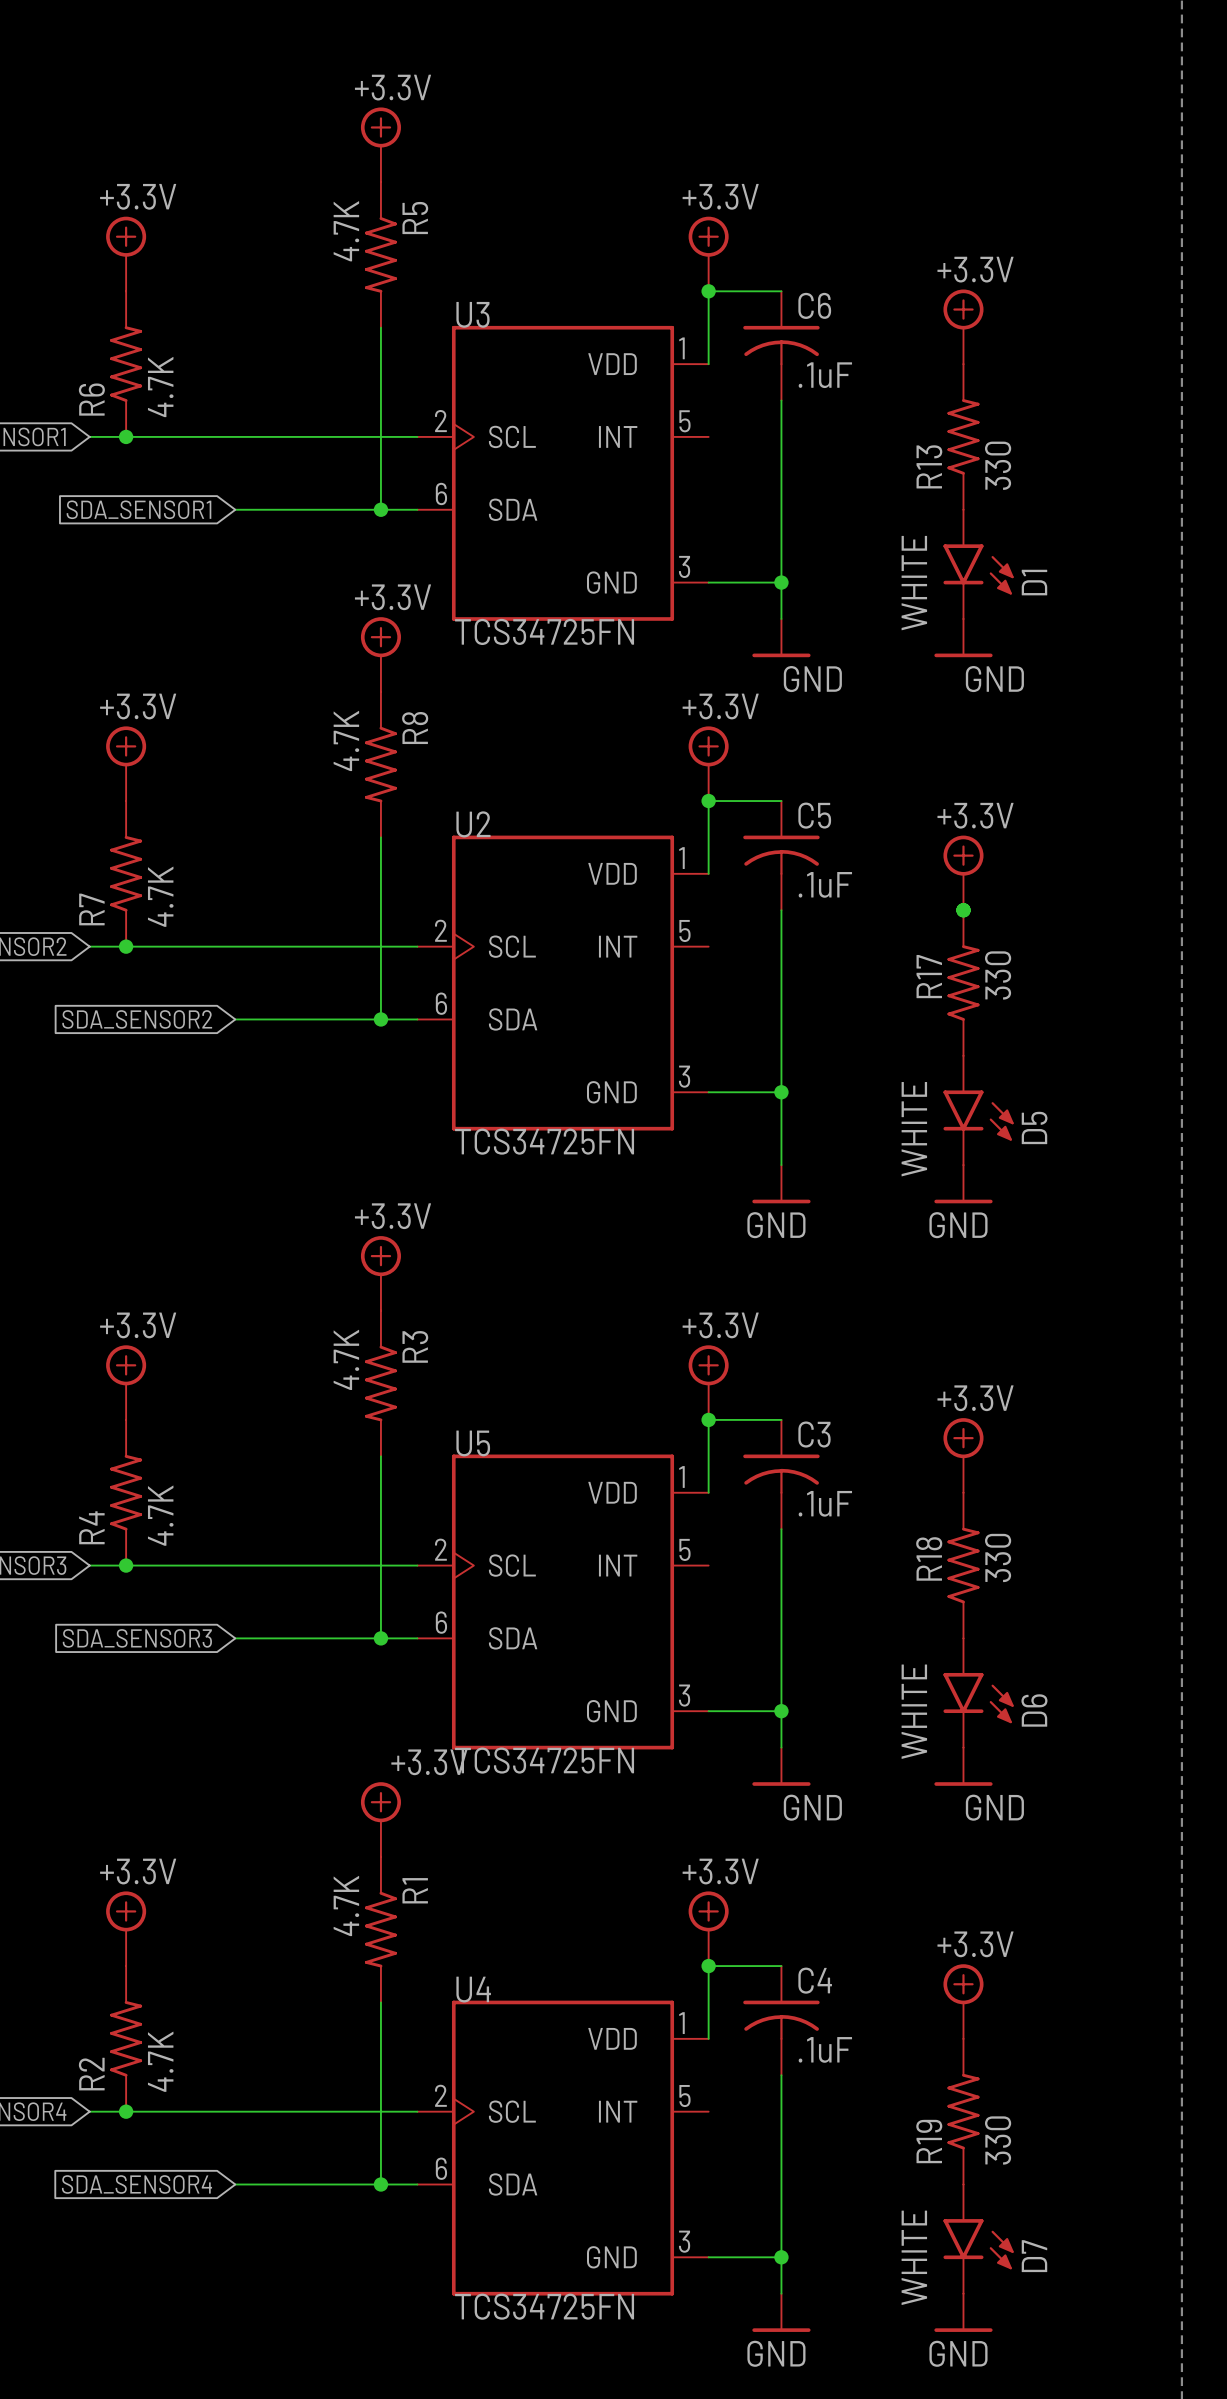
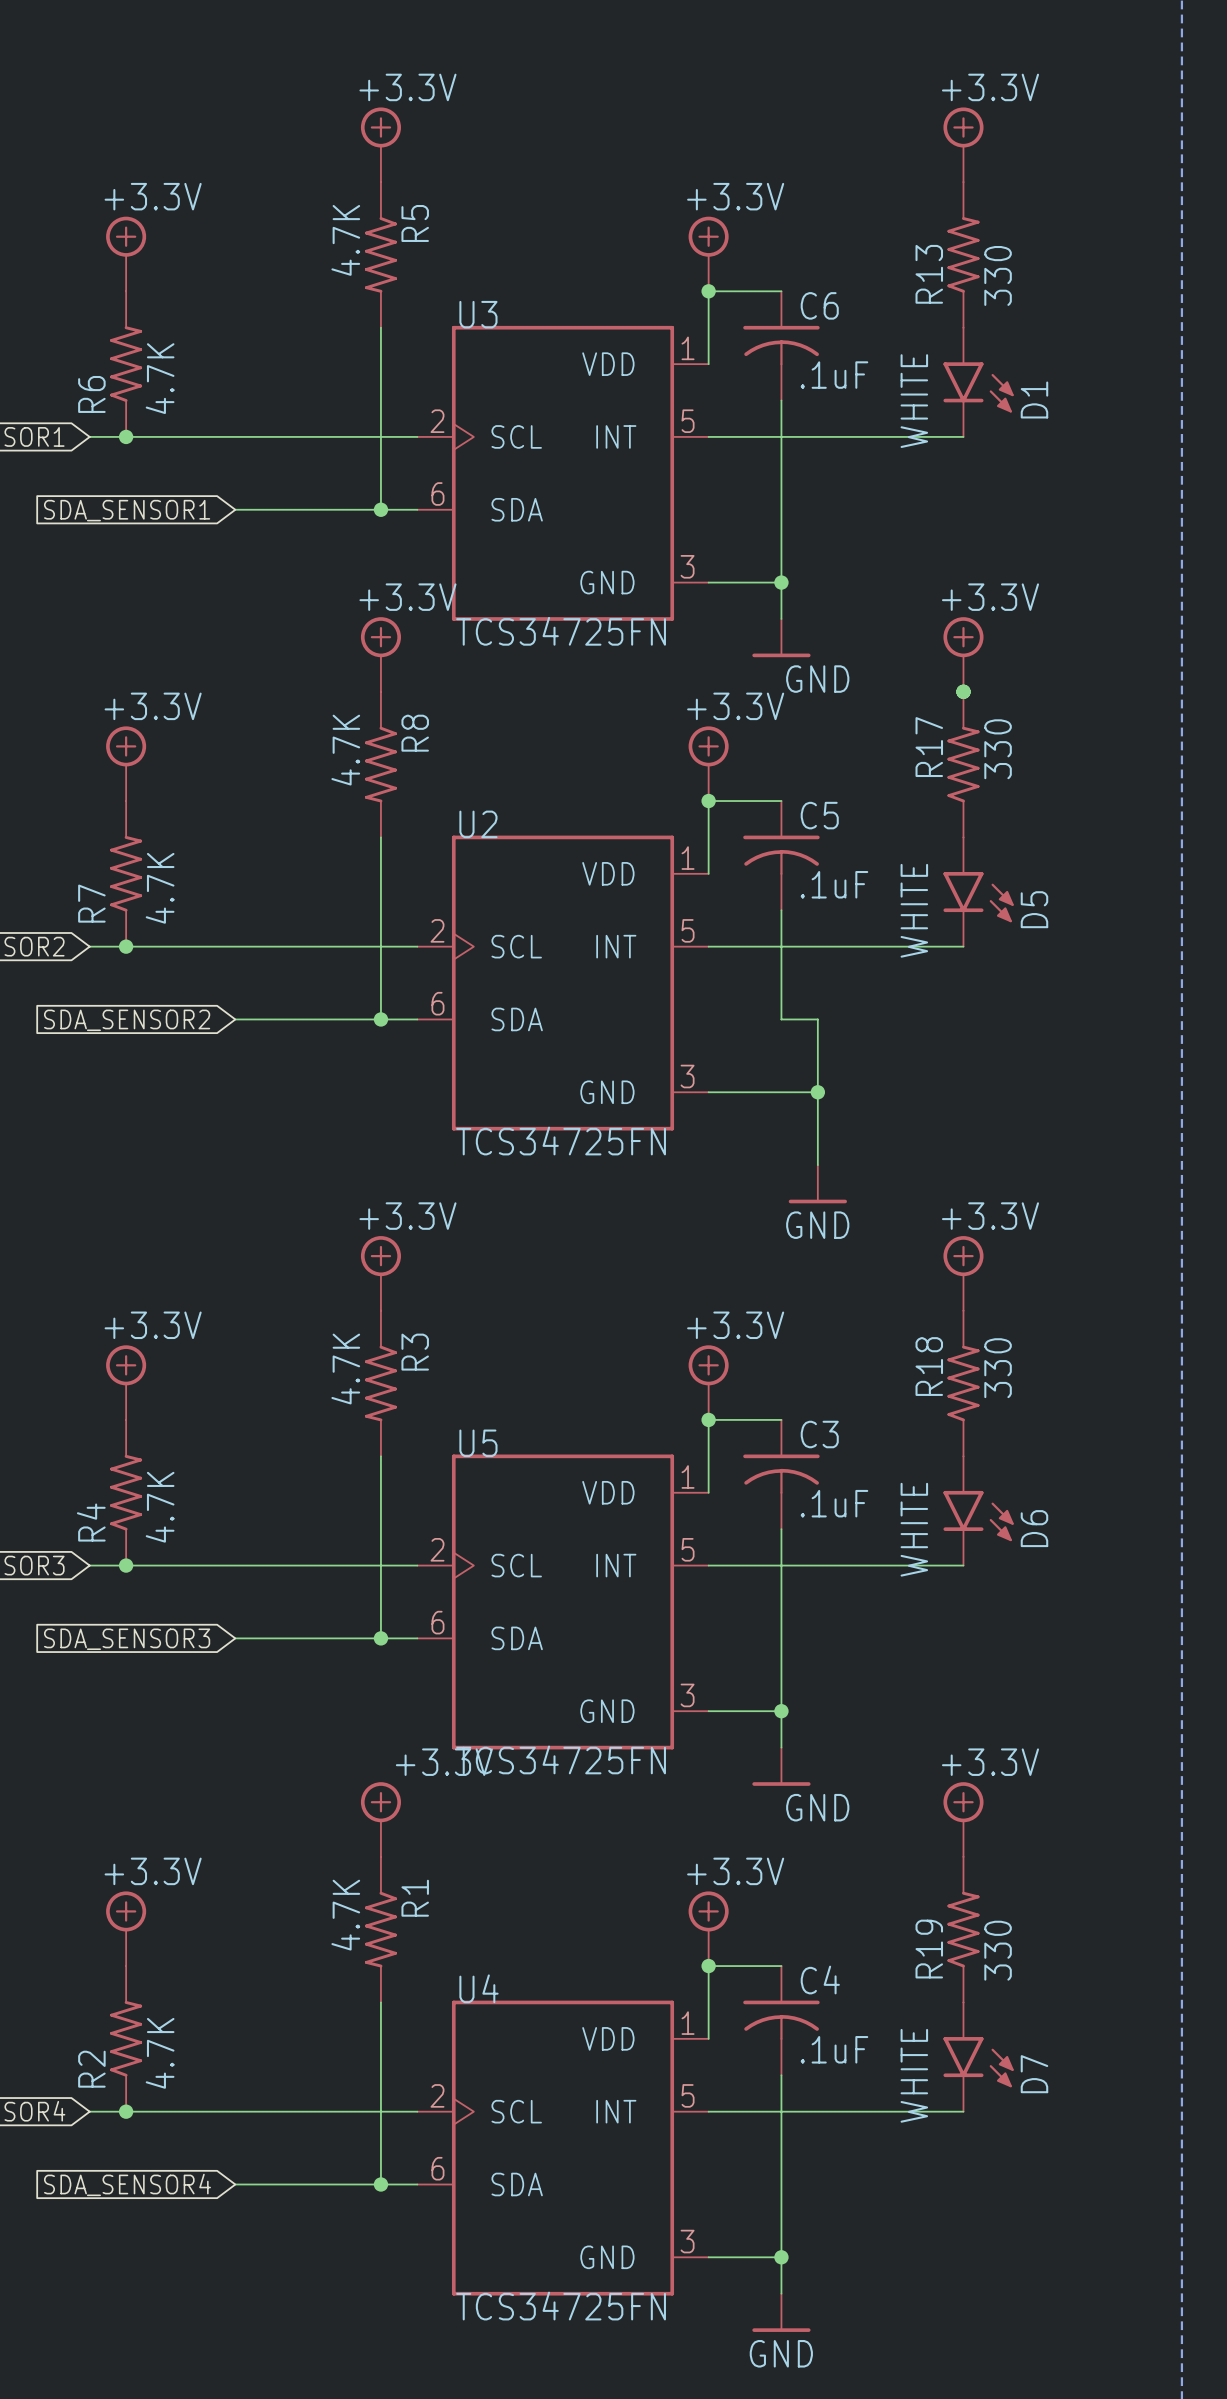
power symbol: none -> +3.3V (963, 144)
power symbol: +3.3V (963, 326) -> none
wire: none -> (708, 436) (963, 436)
R13 position: (963, 436) -> (963, 254)
D1 position: (978, 564) -> (978, 382)
power symbol: GND (963, 638) -> none
power symbol: none -> +3.3V (963, 654)
junction: none -> (963, 691)
power symbol: +3.3V (963, 872) -> none
junction: (963, 910) -> none
wire: none -> (708, 946) (963, 946)
R17 position: (963, 983) -> (963, 764)
wire: (781, 1019) (781, 1165) -> (781, 1019) (817, 1019) (817, 1165)
wire: none -> (781, 1092) (817, 1092)
junction position: (781, 1092) -> (817, 1092)
D5 position: (978, 1110) -> (978, 892)
power symbol position: GND (781, 1184) -> GND (817, 1184)
power symbol: GND (963, 1184) -> none
power symbol: none -> +3.3V (963, 1273)
power symbol: +3.3V (963, 1455) -> none
wire: none -> (708, 1565) (963, 1565)
R18 position: (963, 1565) -> (963, 1383)
D6 position: (978, 1692) -> (978, 1510)
power symbol: GND (963, 1766) -> none
power symbol: none -> +3.3V (963, 1819)
power symbol: +3.3V (963, 2001) -> none
wire: none -> (708, 2111) (963, 2111)
R19 position: (963, 2111) -> (963, 1929)
D7 position: (978, 2239) -> (978, 2057)
power symbol: GND (963, 2312) -> none

